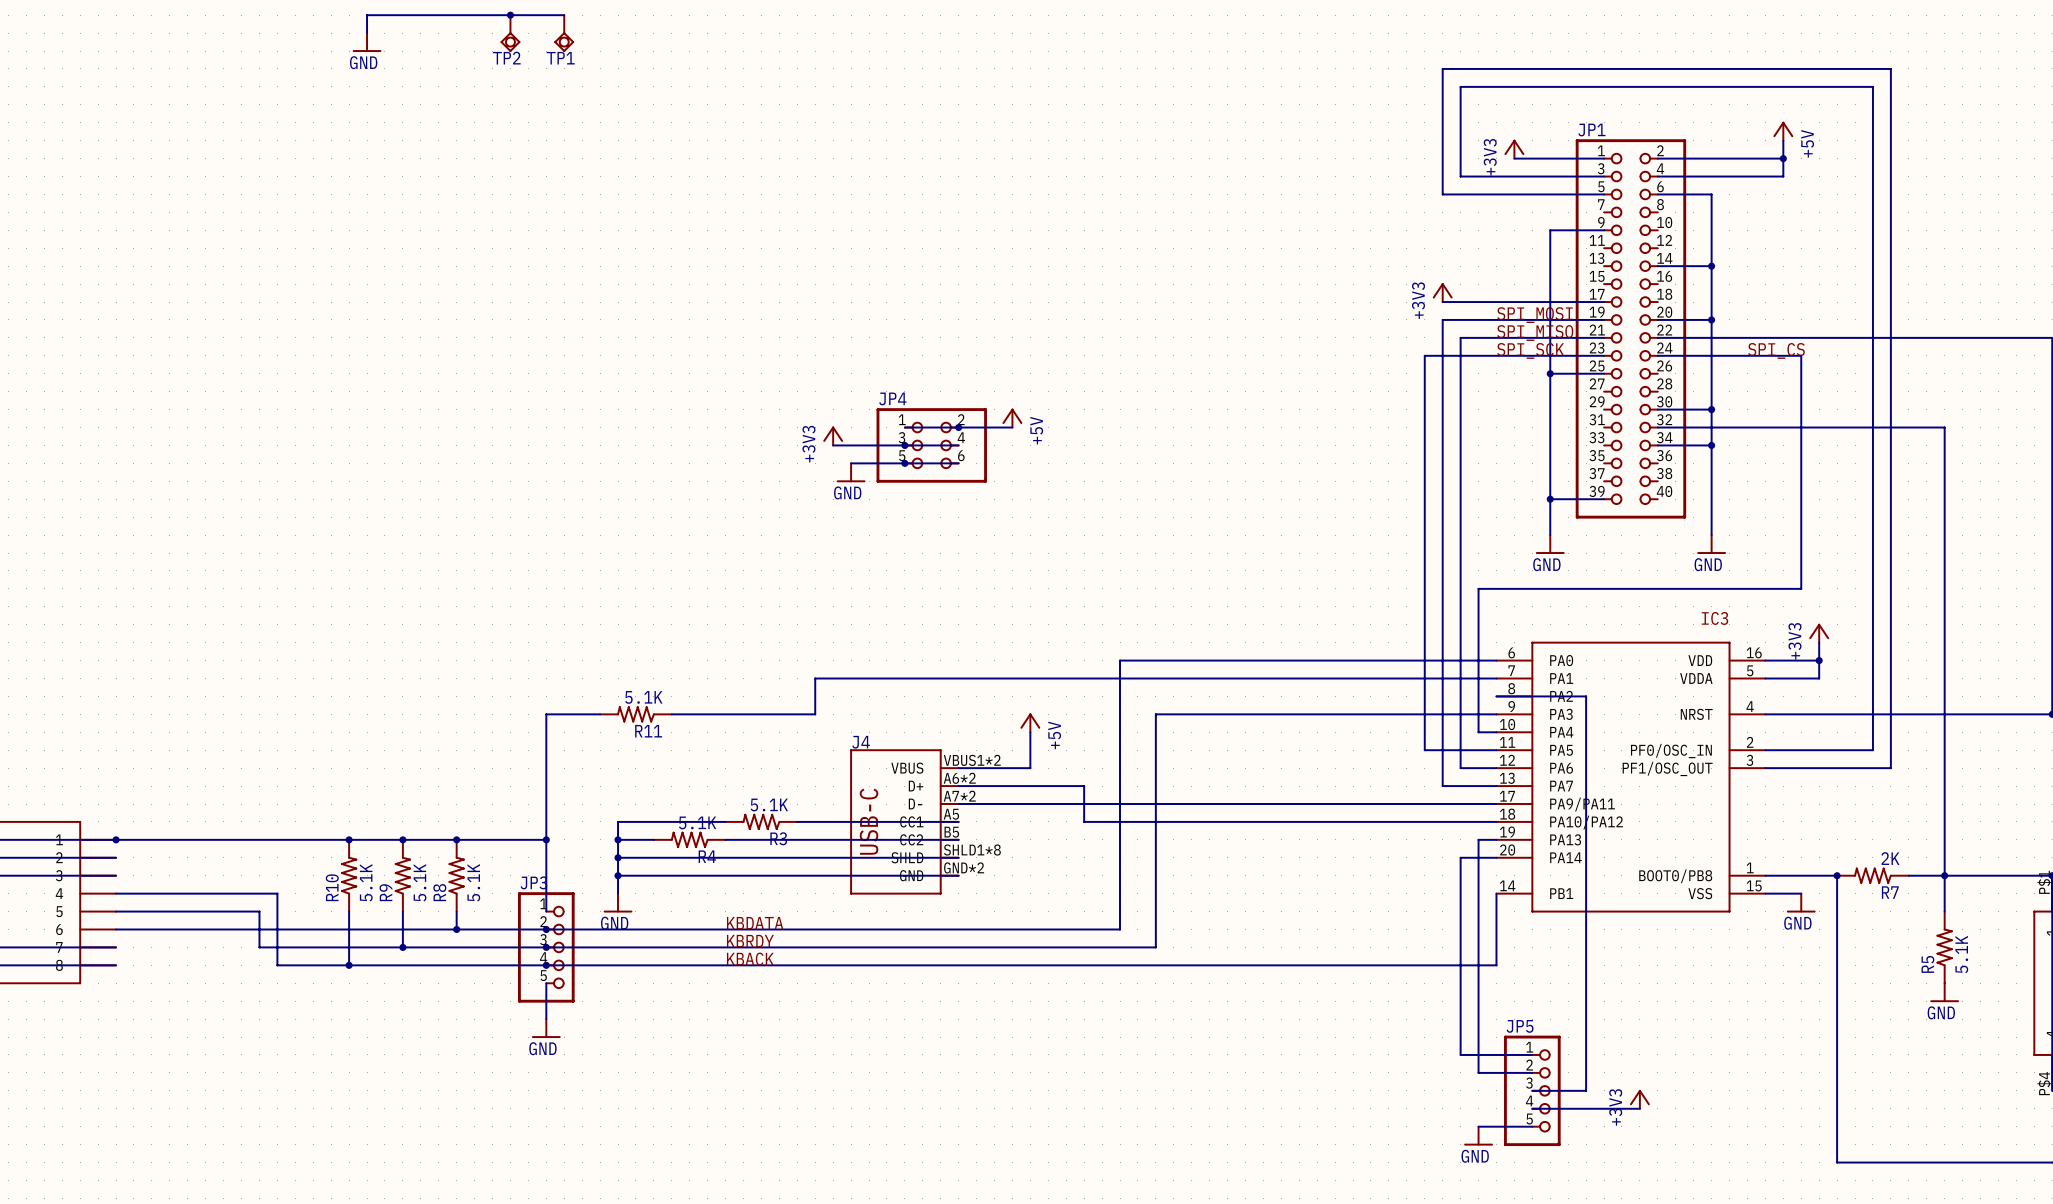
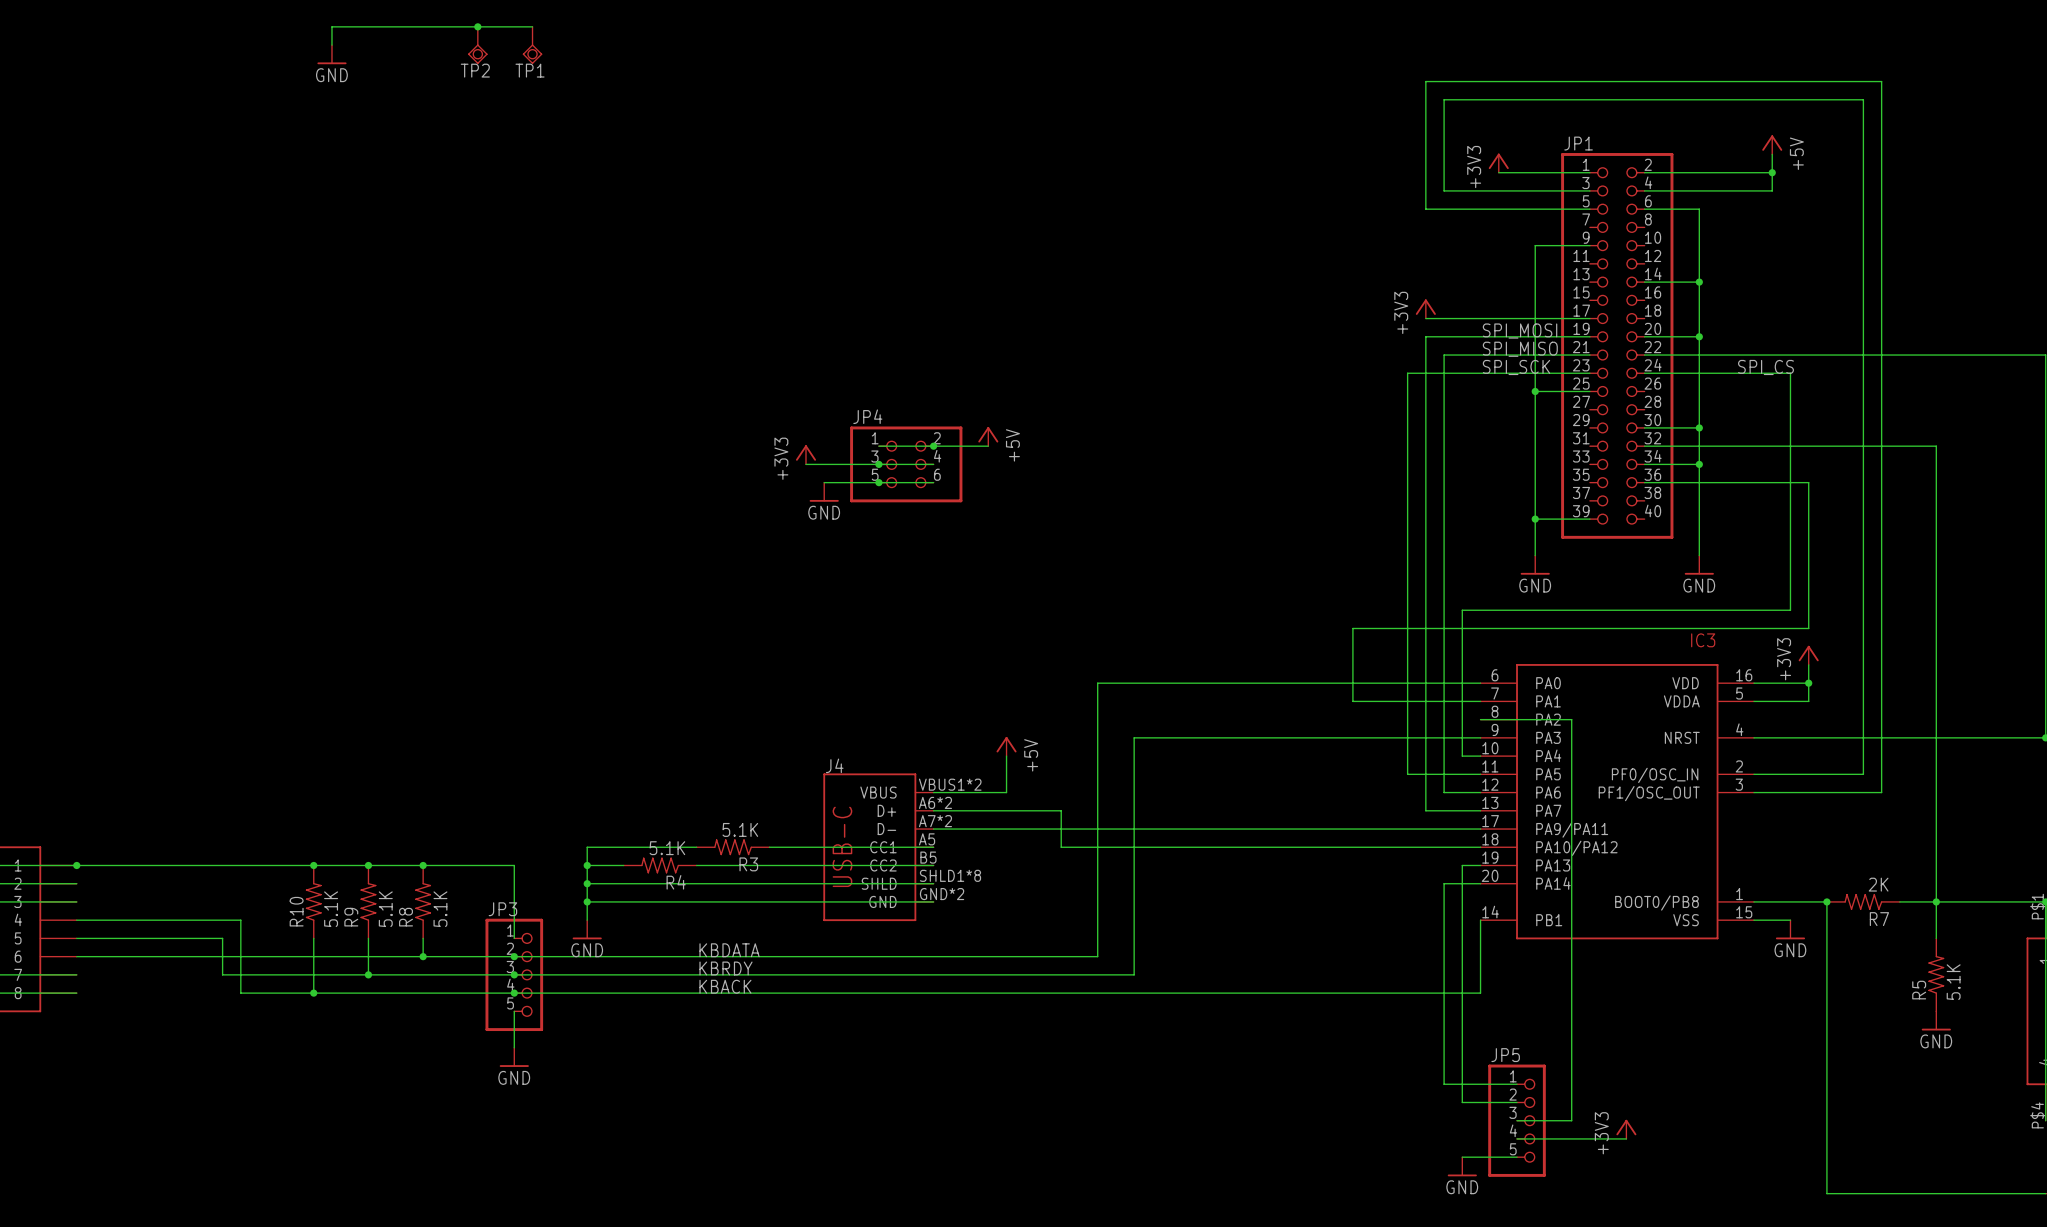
wire: (1370, 678) (815, 678) (815, 714) (671, 714) -> (1352, 701) (1352, 628) (1808, 628) (1808, 482) (1644, 482)
wire: (600, 714) (546, 714) (546, 839) -> none
R11: 5.1K (635, 714) -> none
junction: (546, 839) -> none

